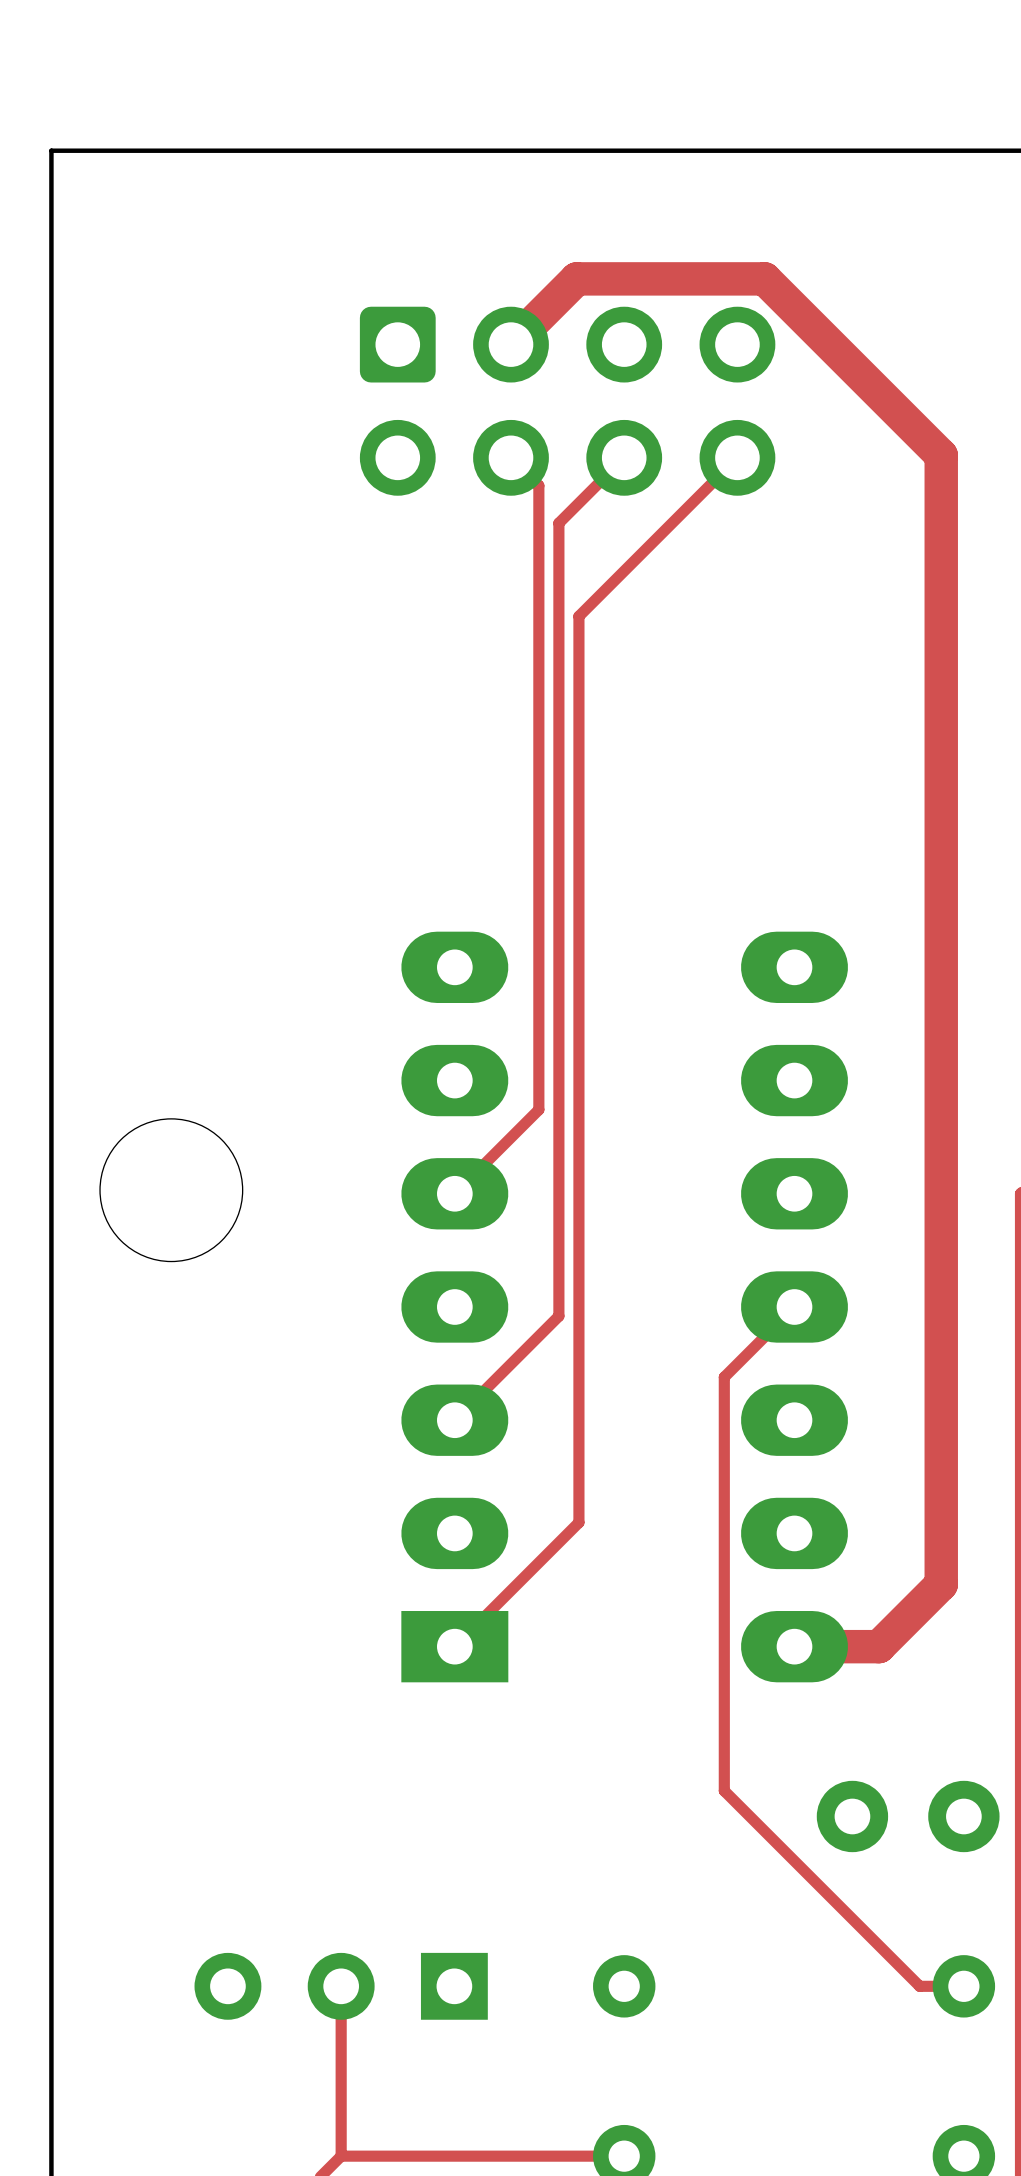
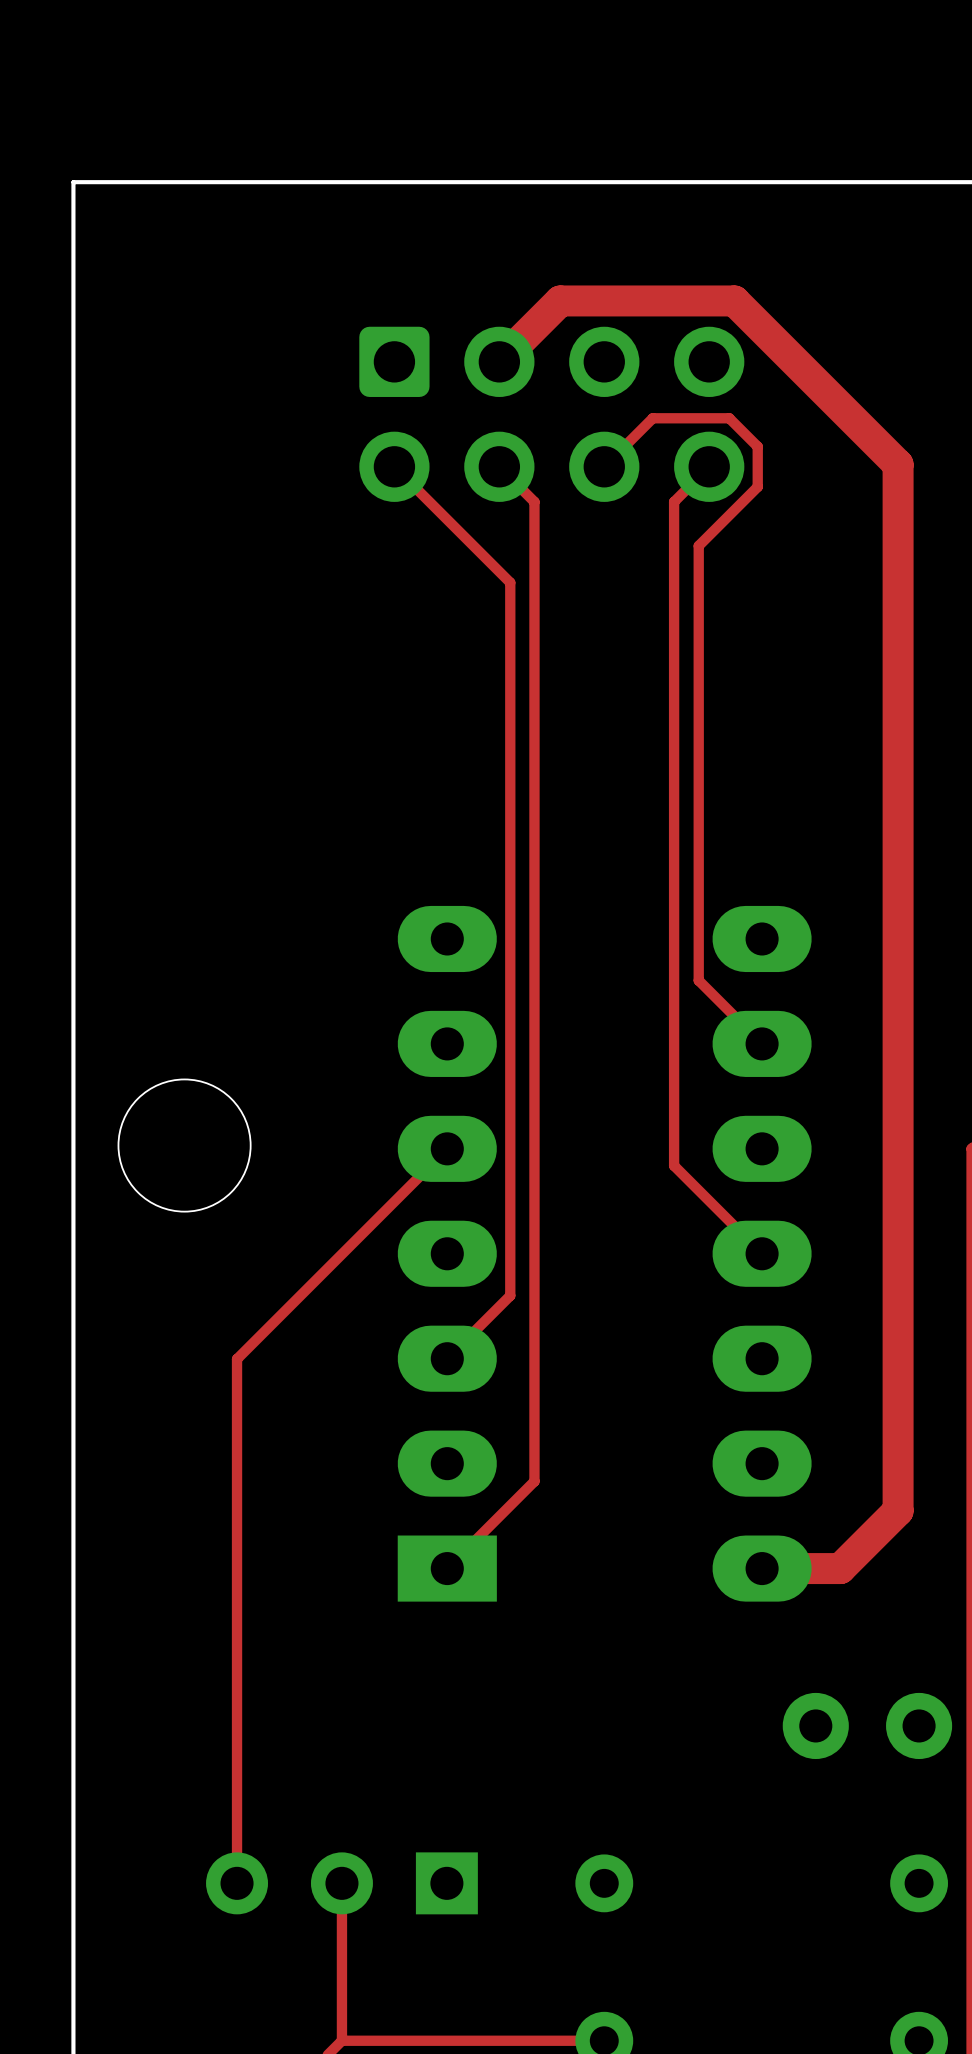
track: (624, 457) (558, 523) (558, 1316) (522, 1352) -> (394, 466) (510, 582) (510, 1295)
track: none -> (604, 466) (652, 418) (729, 418) (757, 446) (757, 486) (698, 545) (698, 980) (762, 1043)
track: (538, 485) (538, 1109) (454, 1193) -> (237, 1883) (237, 1359) (447, 1148)
track: (699, 495) (578, 616) (578, 1522) (548, 1552) -> (525, 492) (534, 501) (534, 1481)
track: (794, 1306) (724, 1377) (724, 1790) (919, 1986) (963, 1986) -> (762, 1253) (674, 1165) (674, 501)

